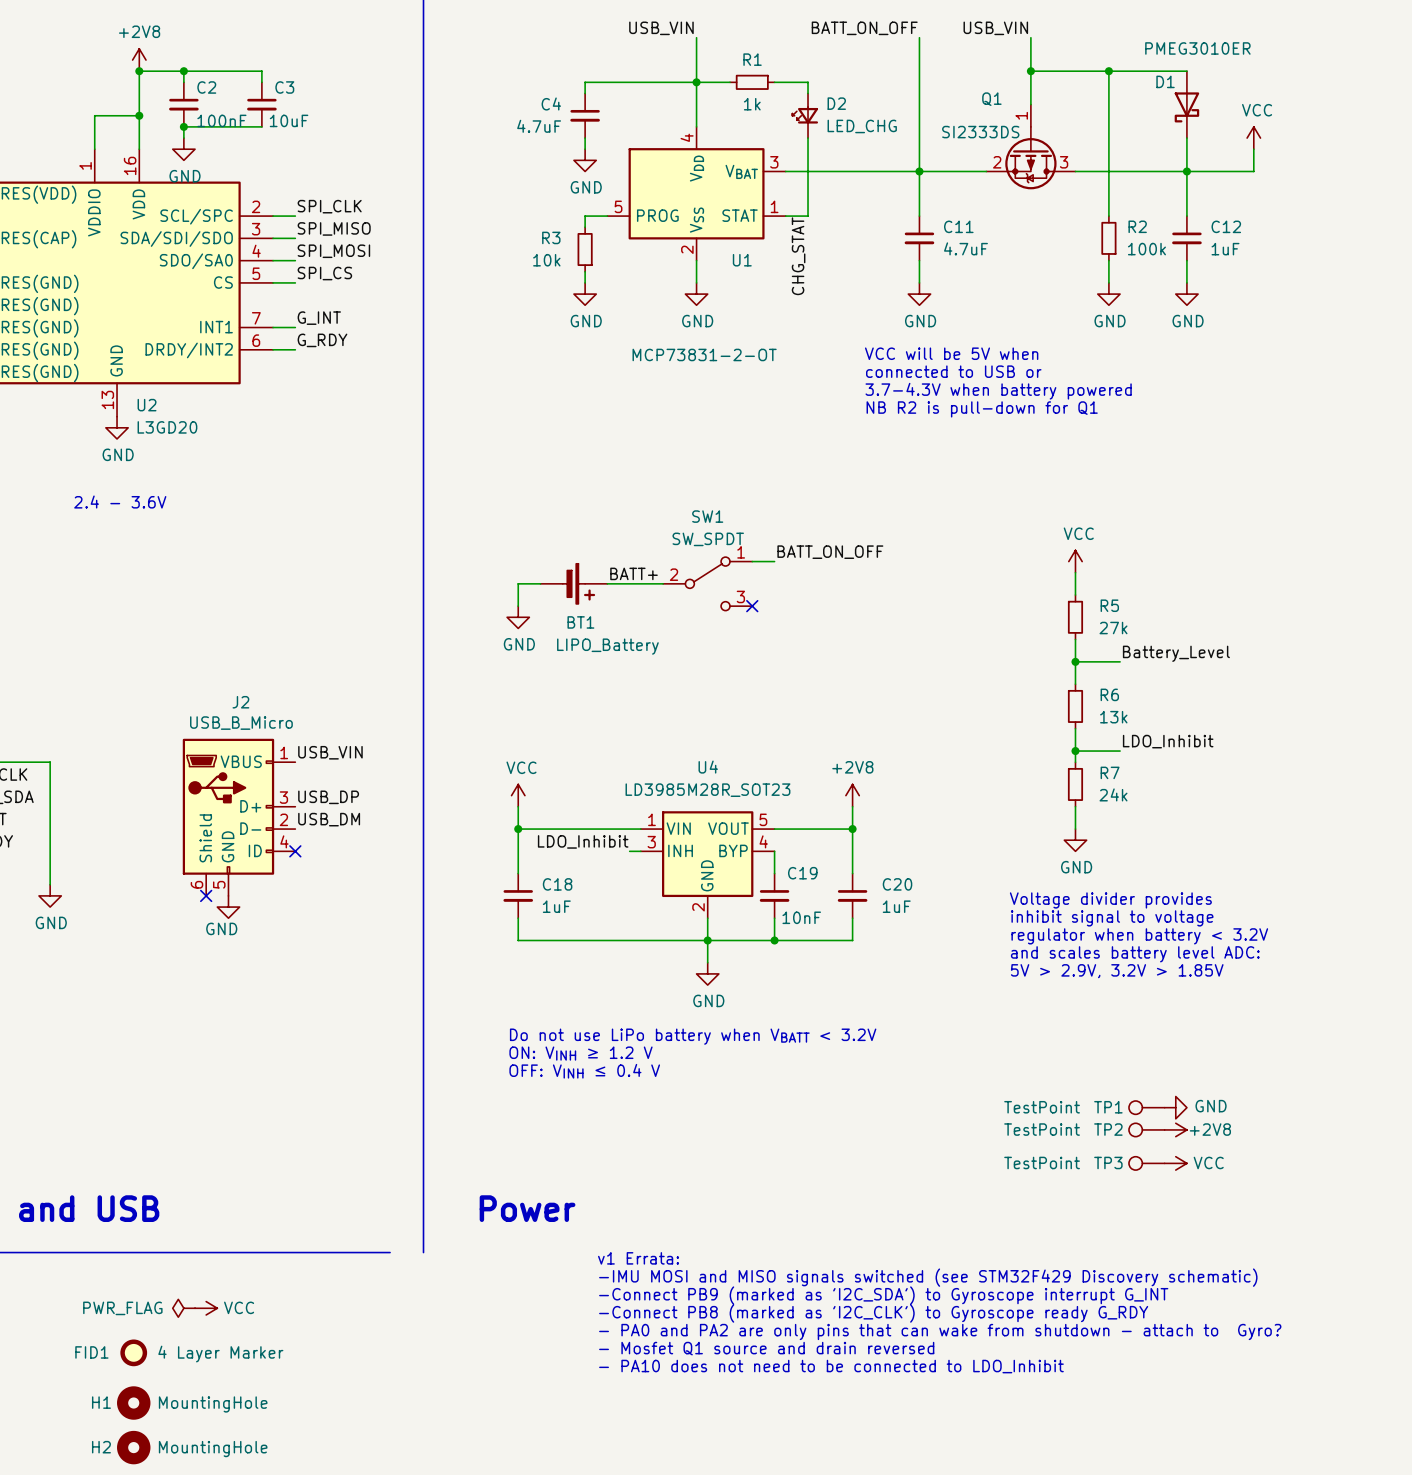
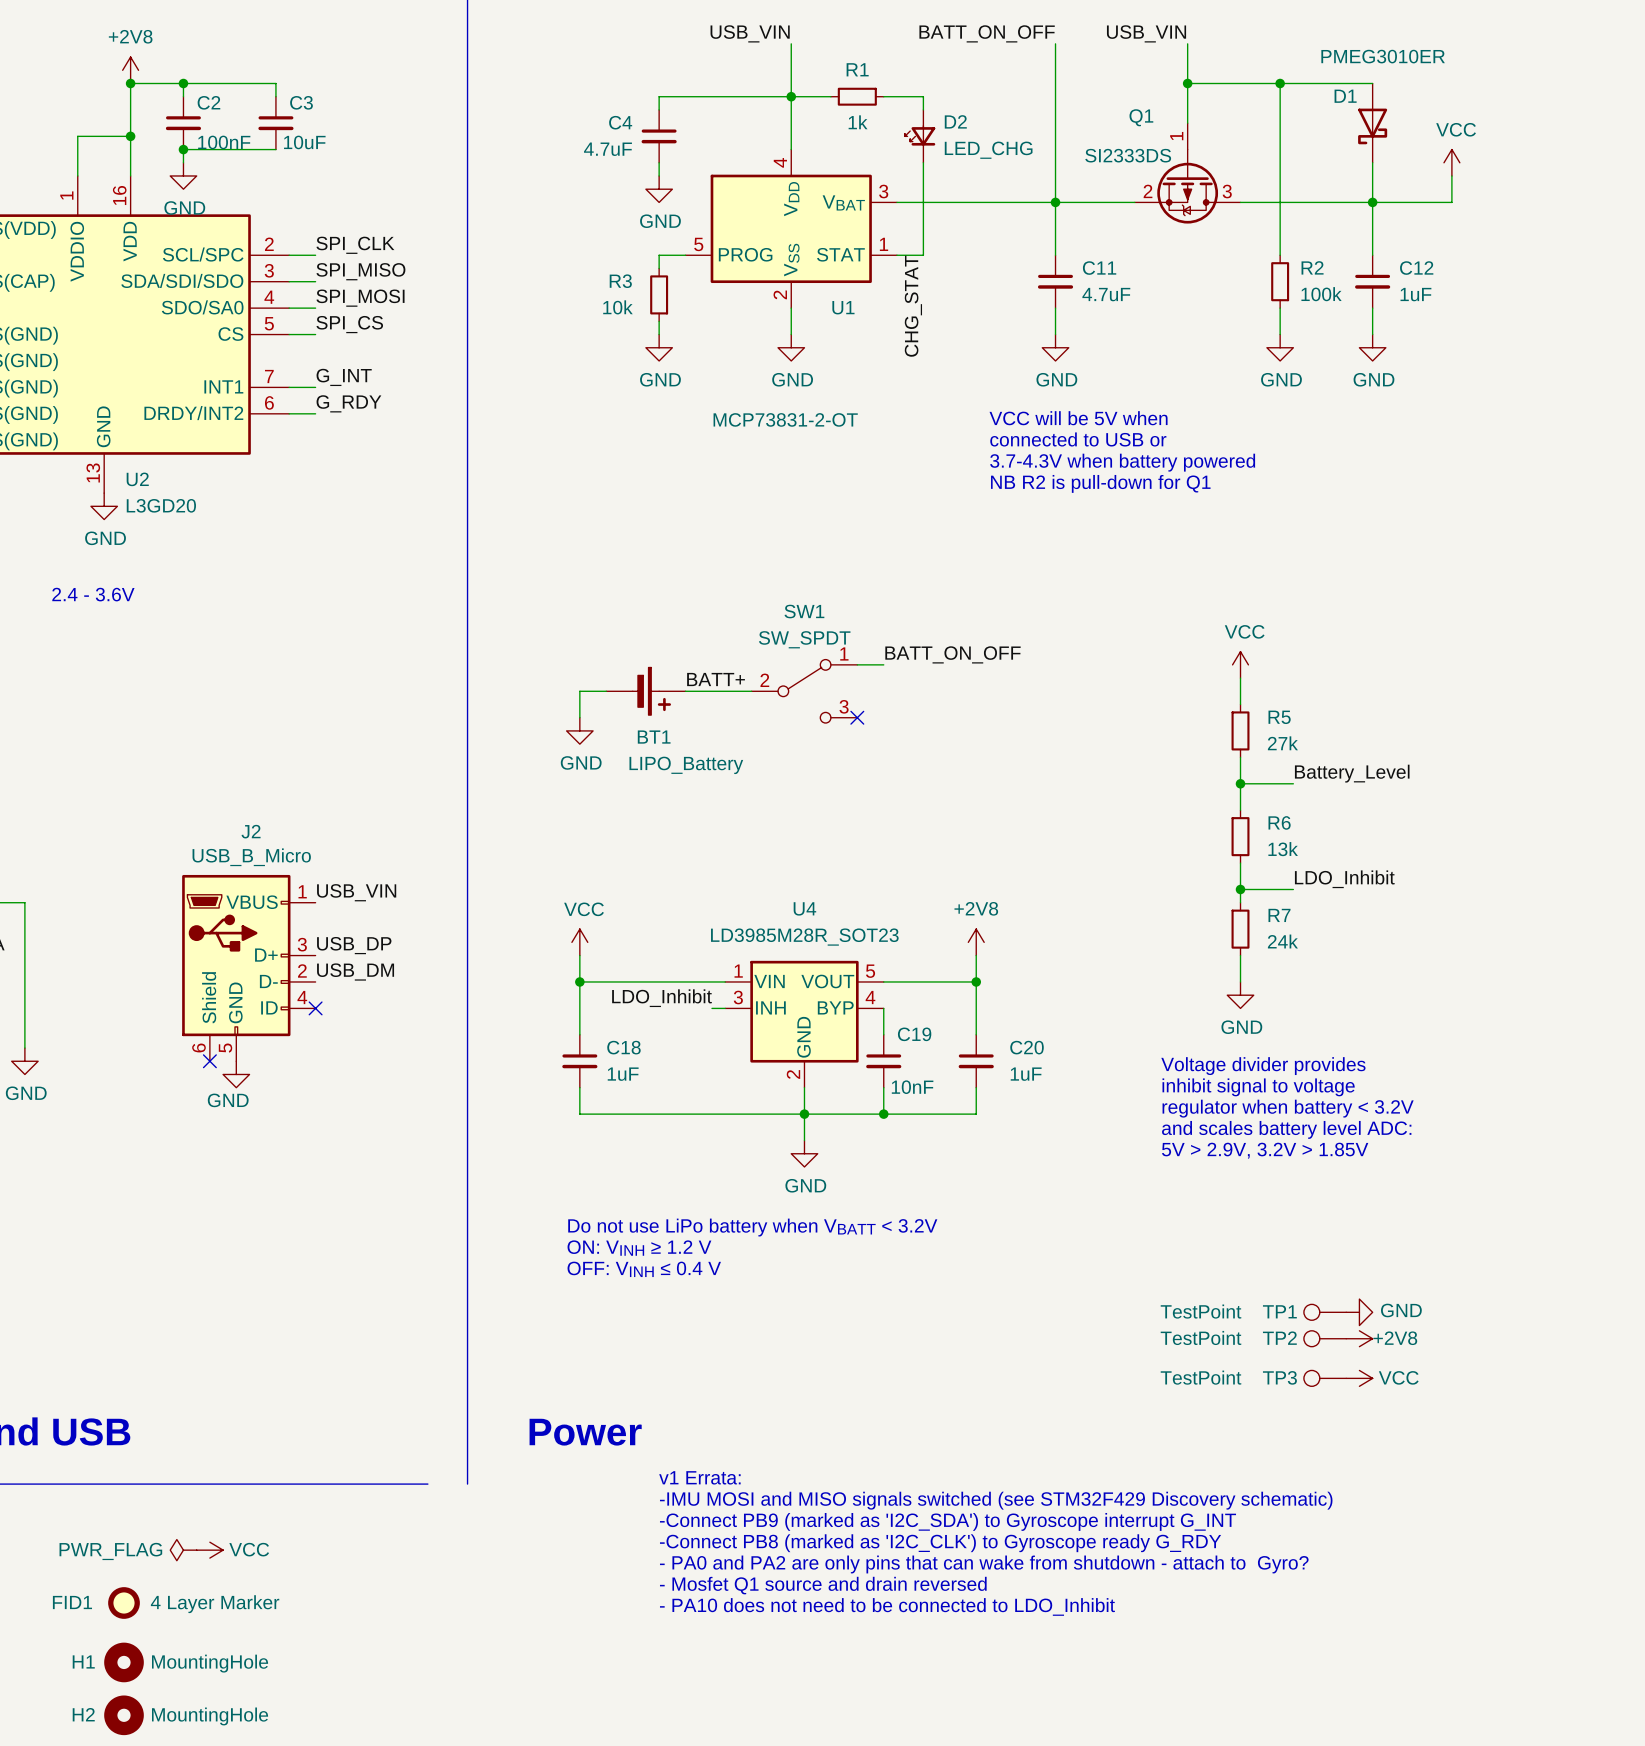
text position: v1 Errata: (638, 1258) -> v1 Errata: (699, 1477)
text position: -IMU MOSI and MISO signals switched (see STM32F429 Discovery schematic) (928, 1277) -> -IMU MOSI and MISO signals switched (see STM32F429 Discovery schematic) (996, 1500)
text position: -Connect PB9 (marked as 'I2C_SDA') to Gyroscope interrupt G_INT (883, 1295) -> -Connect PB9 (marked as 'I2C_SDA') to Gyroscope interrupt G_INT (948, 1521)
text position: -Connect PB8 (marked as 'I2C_CLK') to Gyroscope ready G_RDY (873, 1313) -> -Connect PB8 (marked as 'I2C_CLK') to Gyroscope ready G_RDY (940, 1543)
text position: - PA0 and PA2 are only pins that can wake from shutdown - attach to Gyro? (940, 1331) -> - PA0 and PA2 are only pins that can wake from shutdown - attach to Gyro? (984, 1564)
text position: - Mosfet Q1 source and drain reversed (766, 1348) -> - Mosfet Q1 source and drain reversed (823, 1585)
text position: - PA10 does not need to be connected to LDO_Inhibit (831, 1366) -> - PA10 does not need to be connected to LDO_Inhibit (887, 1606)

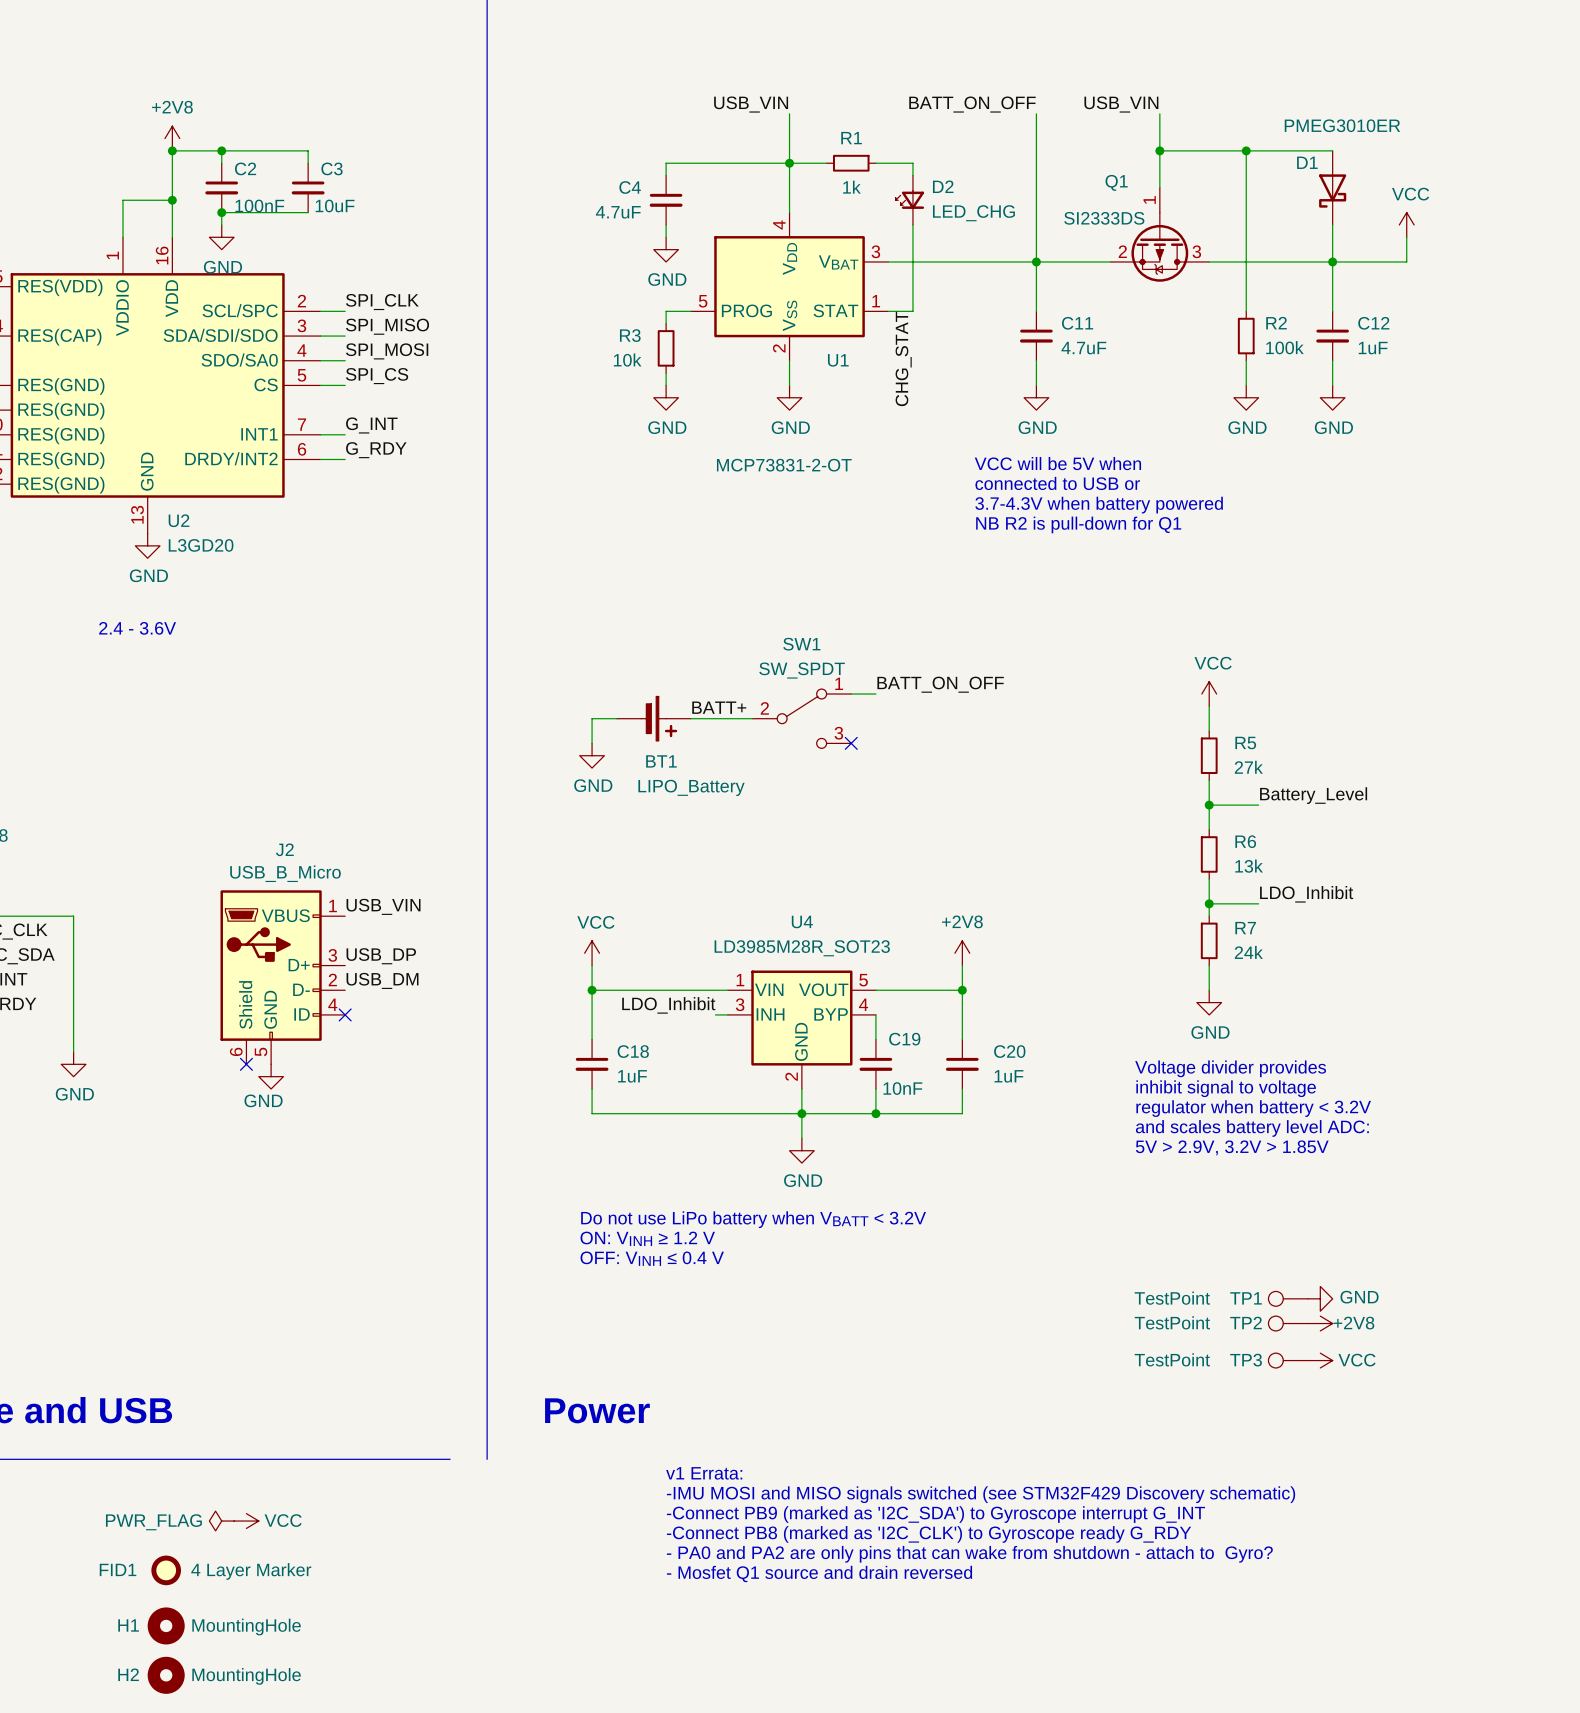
text: v1 Errata: (699, 1477) -> none
text: -IMU MOSI and MISO signals switched (see STM32F429 Discovery schematic) (996, 1500) -> v1 Errata: (704, 1473)
text: -Connect PB9 (marked as 'I2C_SDA') to Gyroscope interrupt G_INT (948, 1521) -> -IMU MOSI and MISO signals switched (see STM32F429 Discovery schematic) (981, 1494)
text: -Connect PB8 (marked as 'I2C_CLK') to Gyroscope ready G_RDY (940, 1543) -> -Connect PB9 (marked as 'I2C_SDA') to Gyroscope interrupt G_INT (935, 1514)
text: - PA0 and PA2 are only pins that can wake from shutdown - attach to Gyro? (984, 1564) -> -Connect PB8 (marked as 'I2C_CLK') to Gyroscope ready G_RDY (929, 1534)
text: - Mosfet Q1 source and drain reversed (823, 1585) -> - PA0 and PA2 are only pins that can wake from shutdown - attach to Gyro? (969, 1554)
text: - PA10 does not need to be connected to LDO_Inhibit (887, 1606) -> - Mosfet Q1 source and drain reversed (819, 1574)

